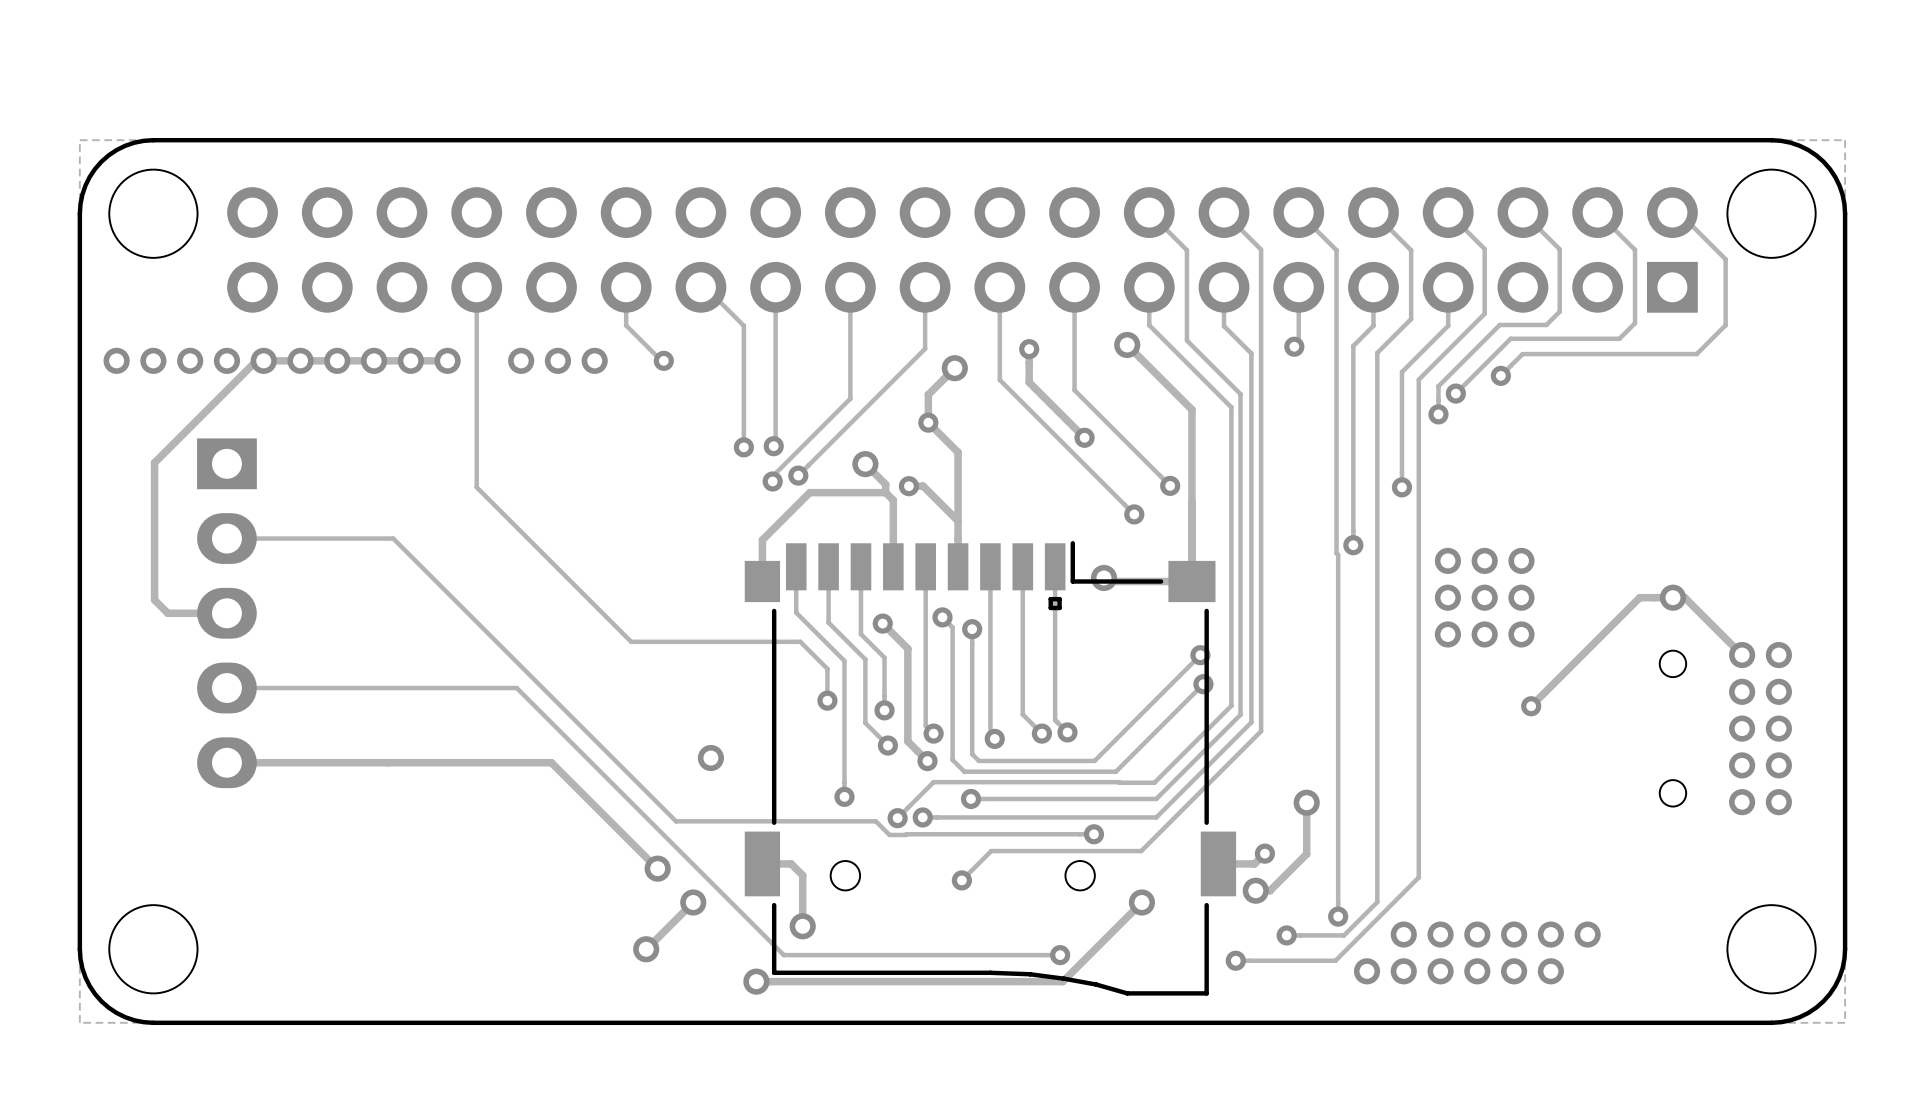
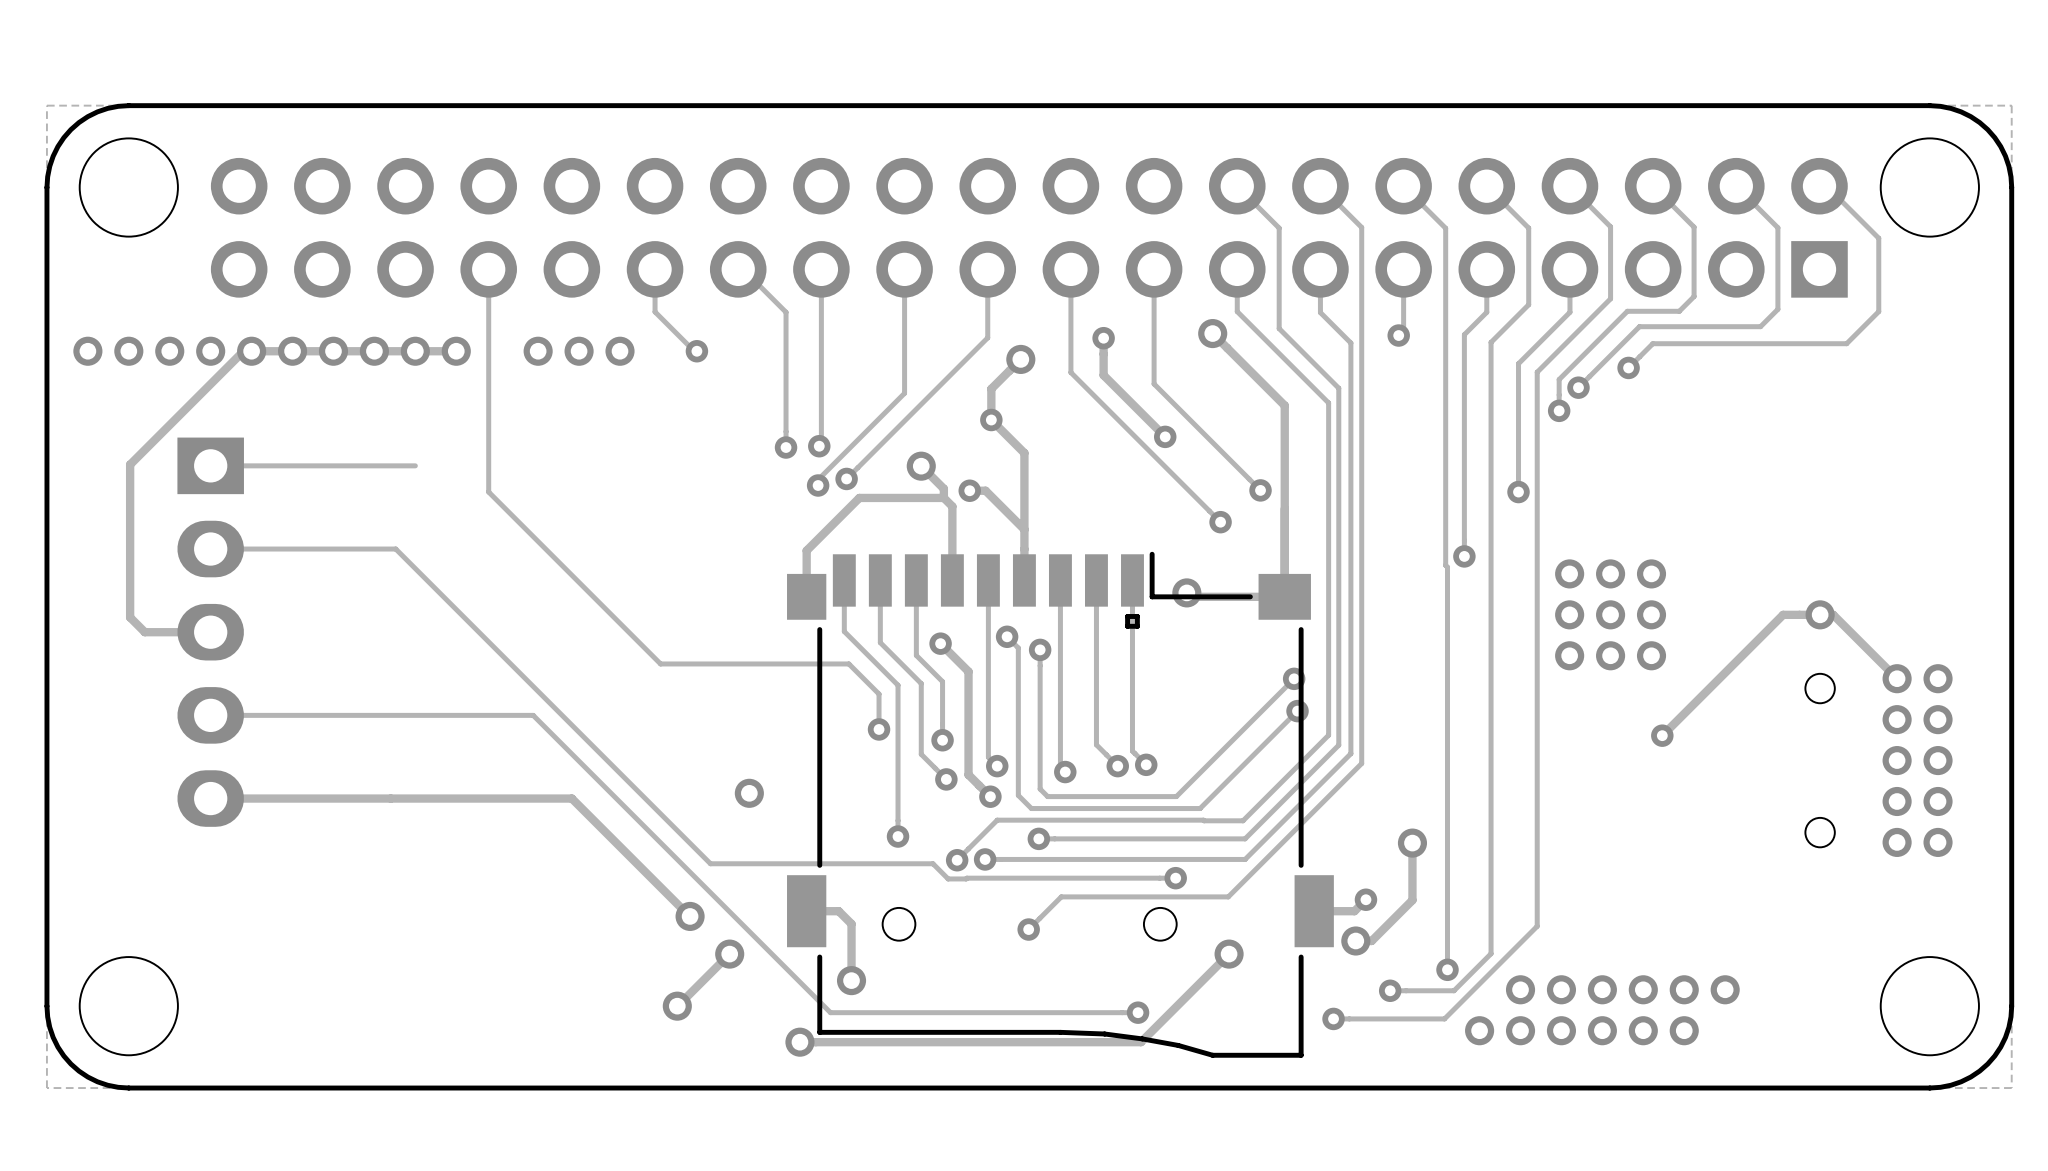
track: none -> (415, 465) (210, 465)

